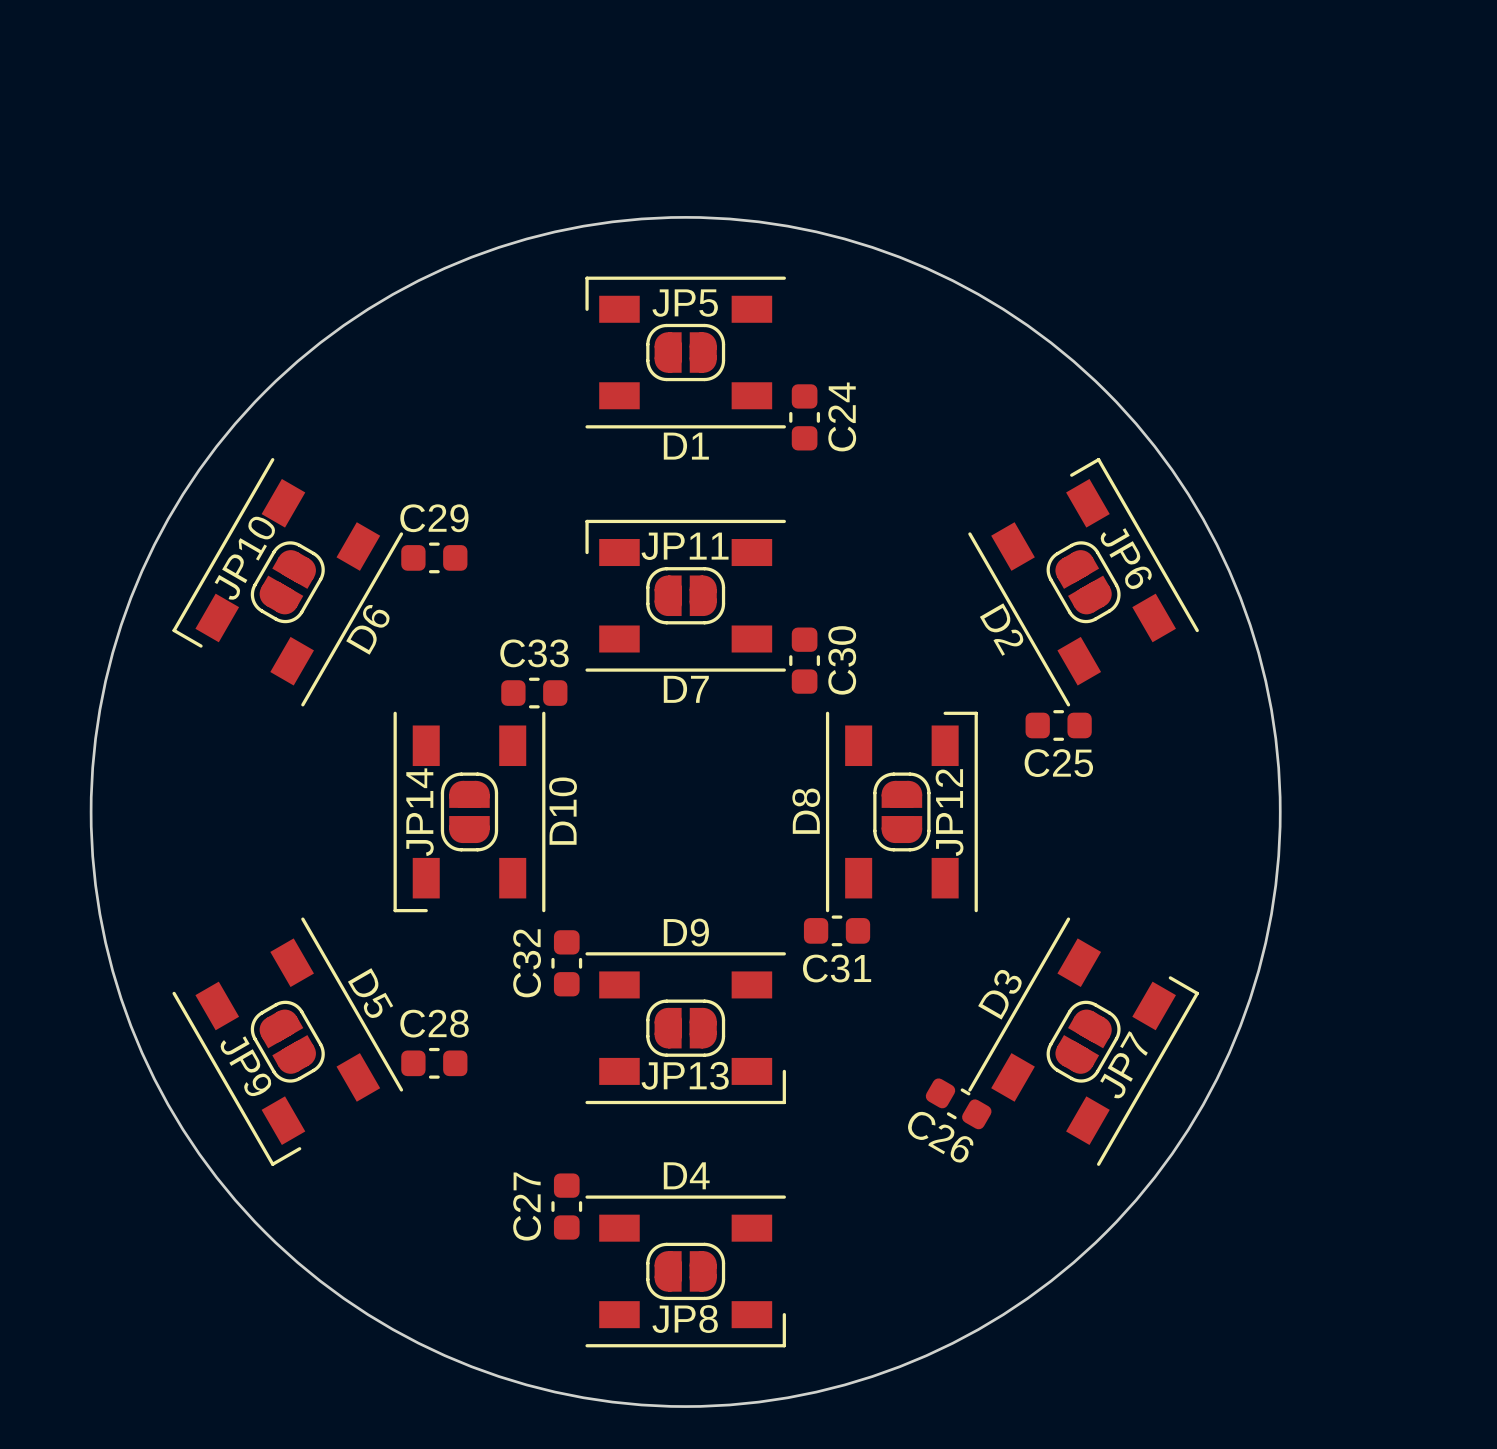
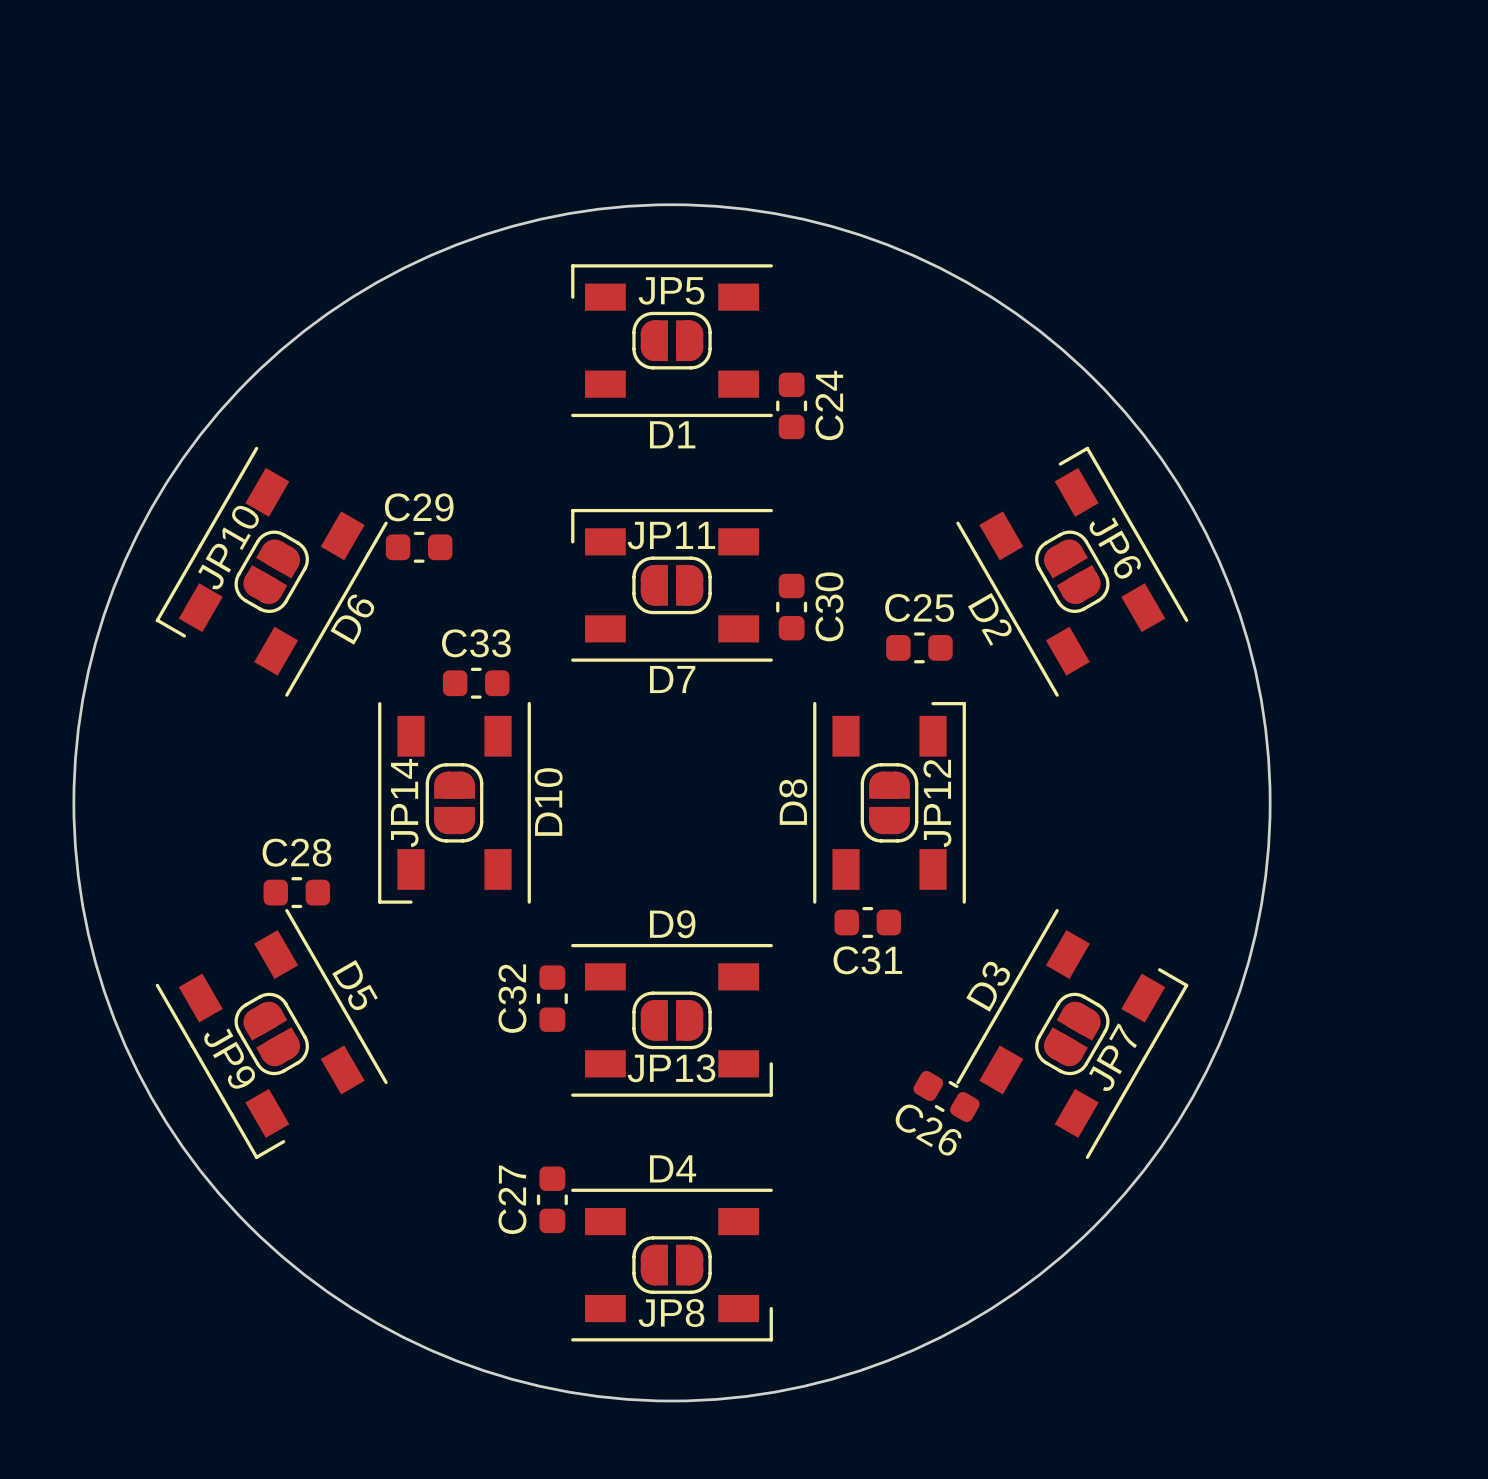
C30 position: (804, 660) -> (791, 607)
C33 position: (534, 693) -> (476, 683)
C25 position: (1058, 725) -> (919, 647)
C25 name position: C25 (1058, 763) -> C25 (919, 607)
C31 position: (837, 930) -> (867, 922)
C32 position: (566, 963) -> (552, 998)
C28 position: (434, 1063) -> (296, 892)

